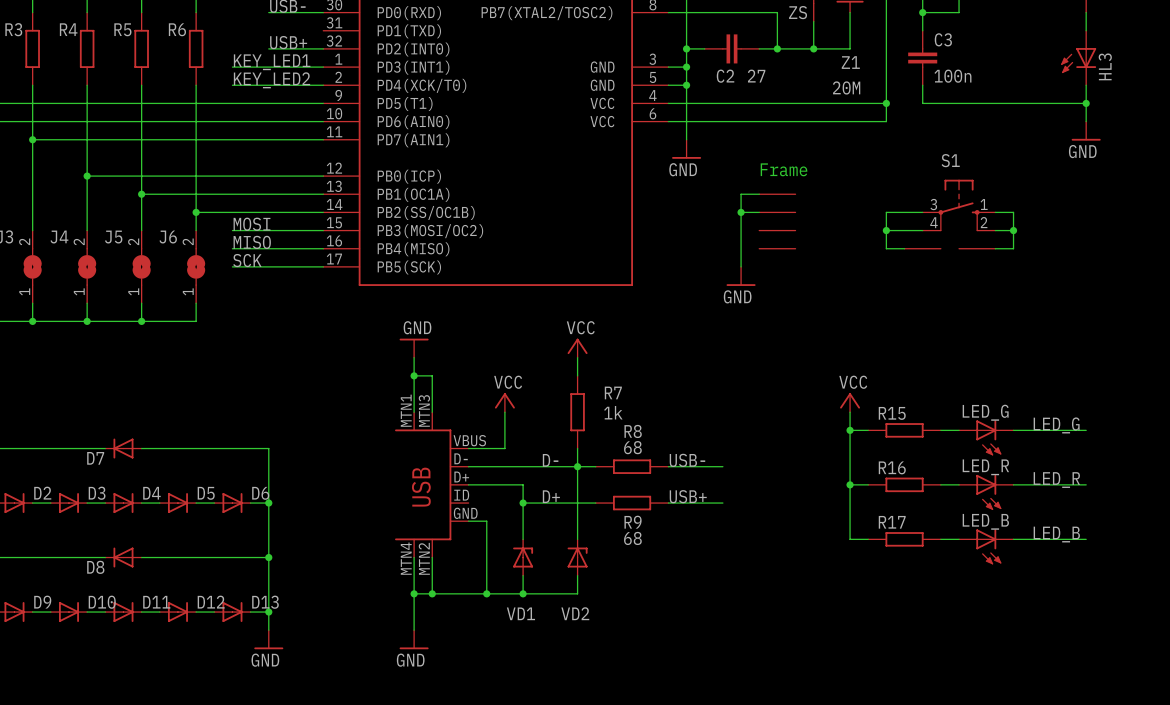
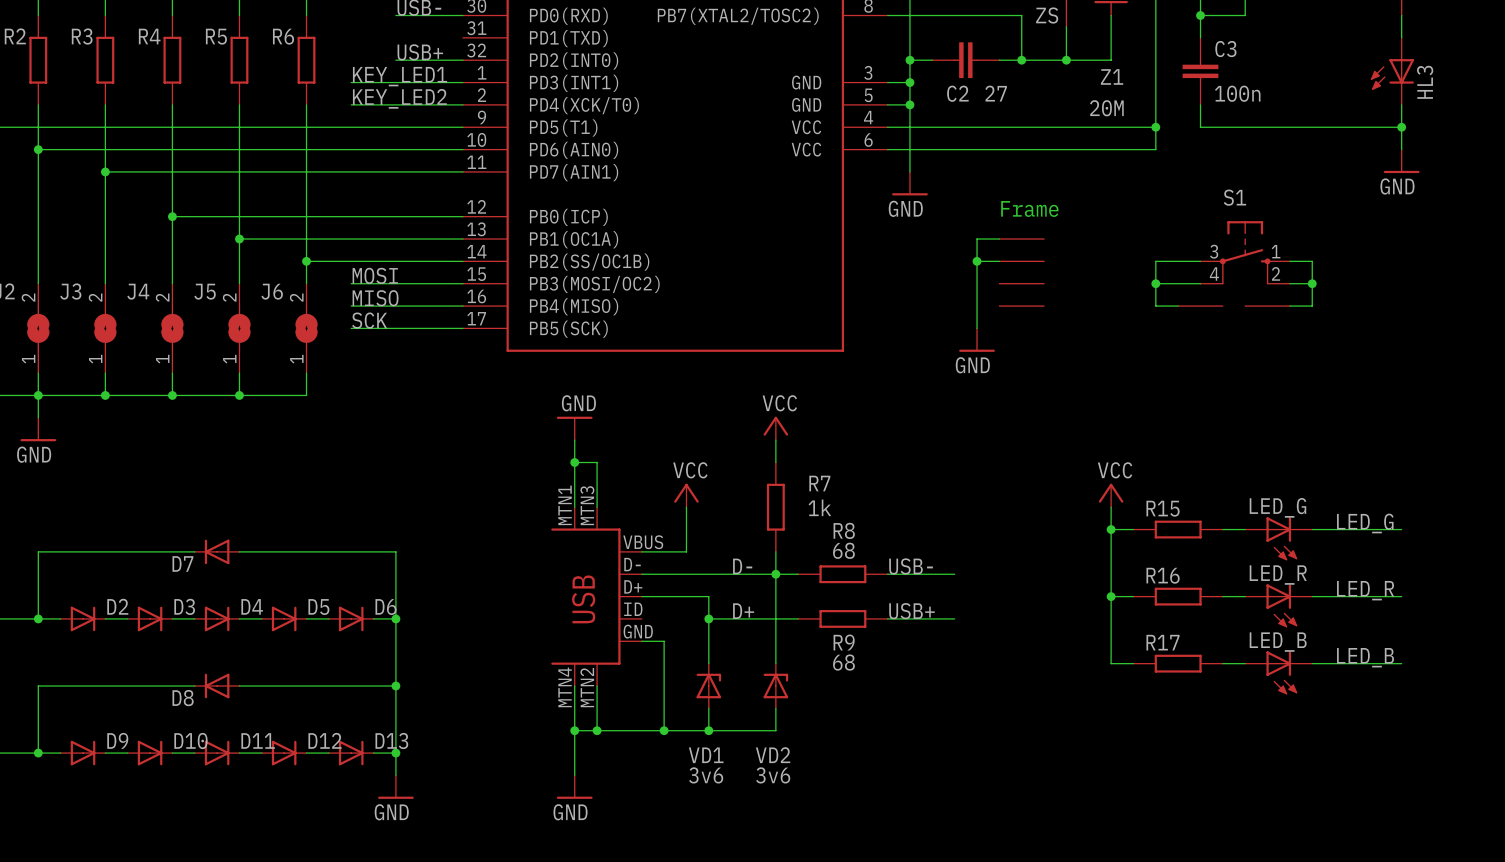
VD1 value: none -> 3v6 (706, 775)
VD2 value: none -> 3v6 (773, 775)

